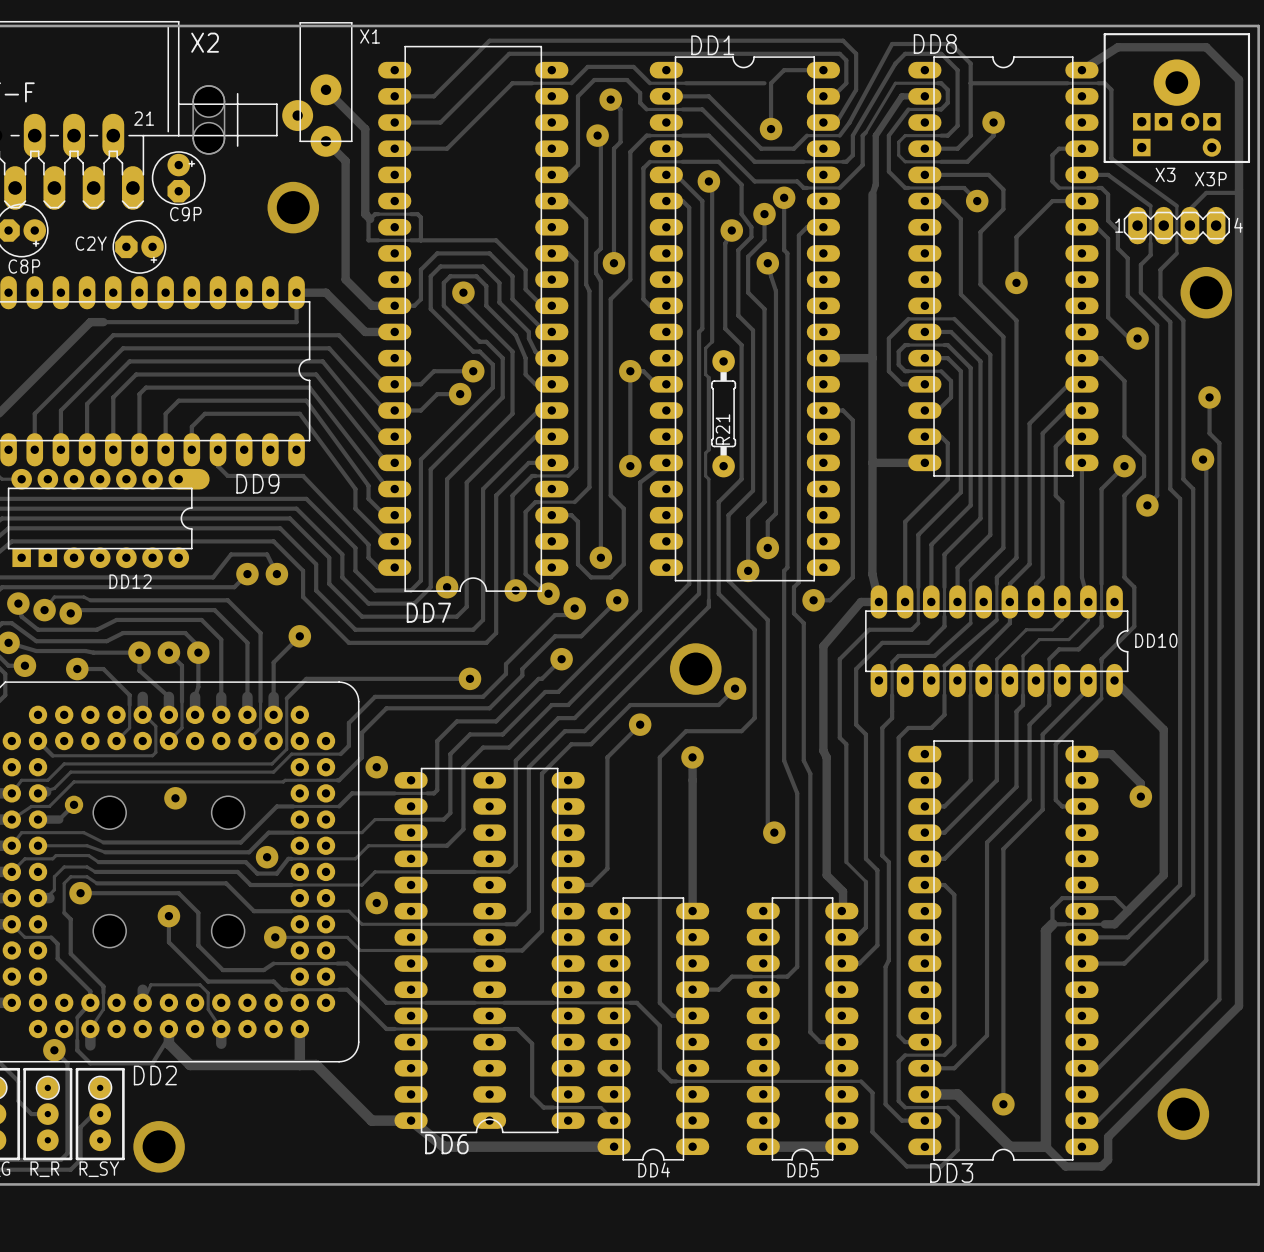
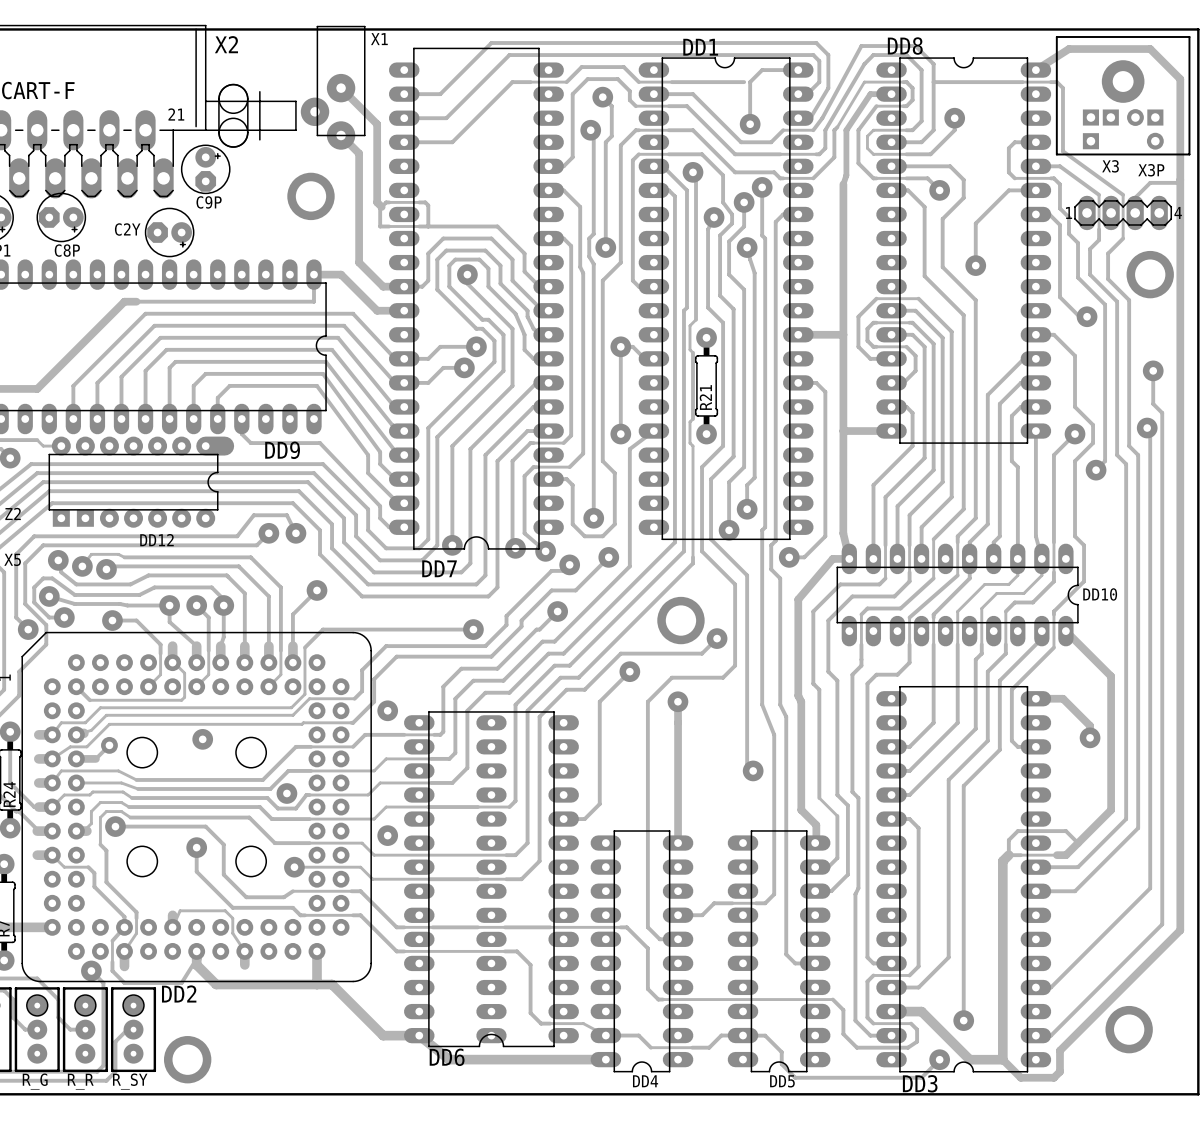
track: (589, 1107) (601, 1107) (614, 1120) -> (583, 1023) (605, 1035) (638, 1035) (650, 1047) (709, 1047) (721, 1035) (743, 1035)
track: (946, 1107) (957, 1117) (957, 1150) (941, 1166) -> (939, 1059) (921, 1077) (906, 1077)
track: (872, 1118) (872, 1132) (906, 1166) -> (843, 1034) (856, 1047) (908, 1047) (917, 1041) (917, 1029) (911, 1023)
track: none -> (743, 1035) (765, 1035) (781, 1052) (781, 1064) (795, 1077) (874, 1077)
track: (763, 1146) (841, 1146) -> none
via: none -> (939, 1059)

